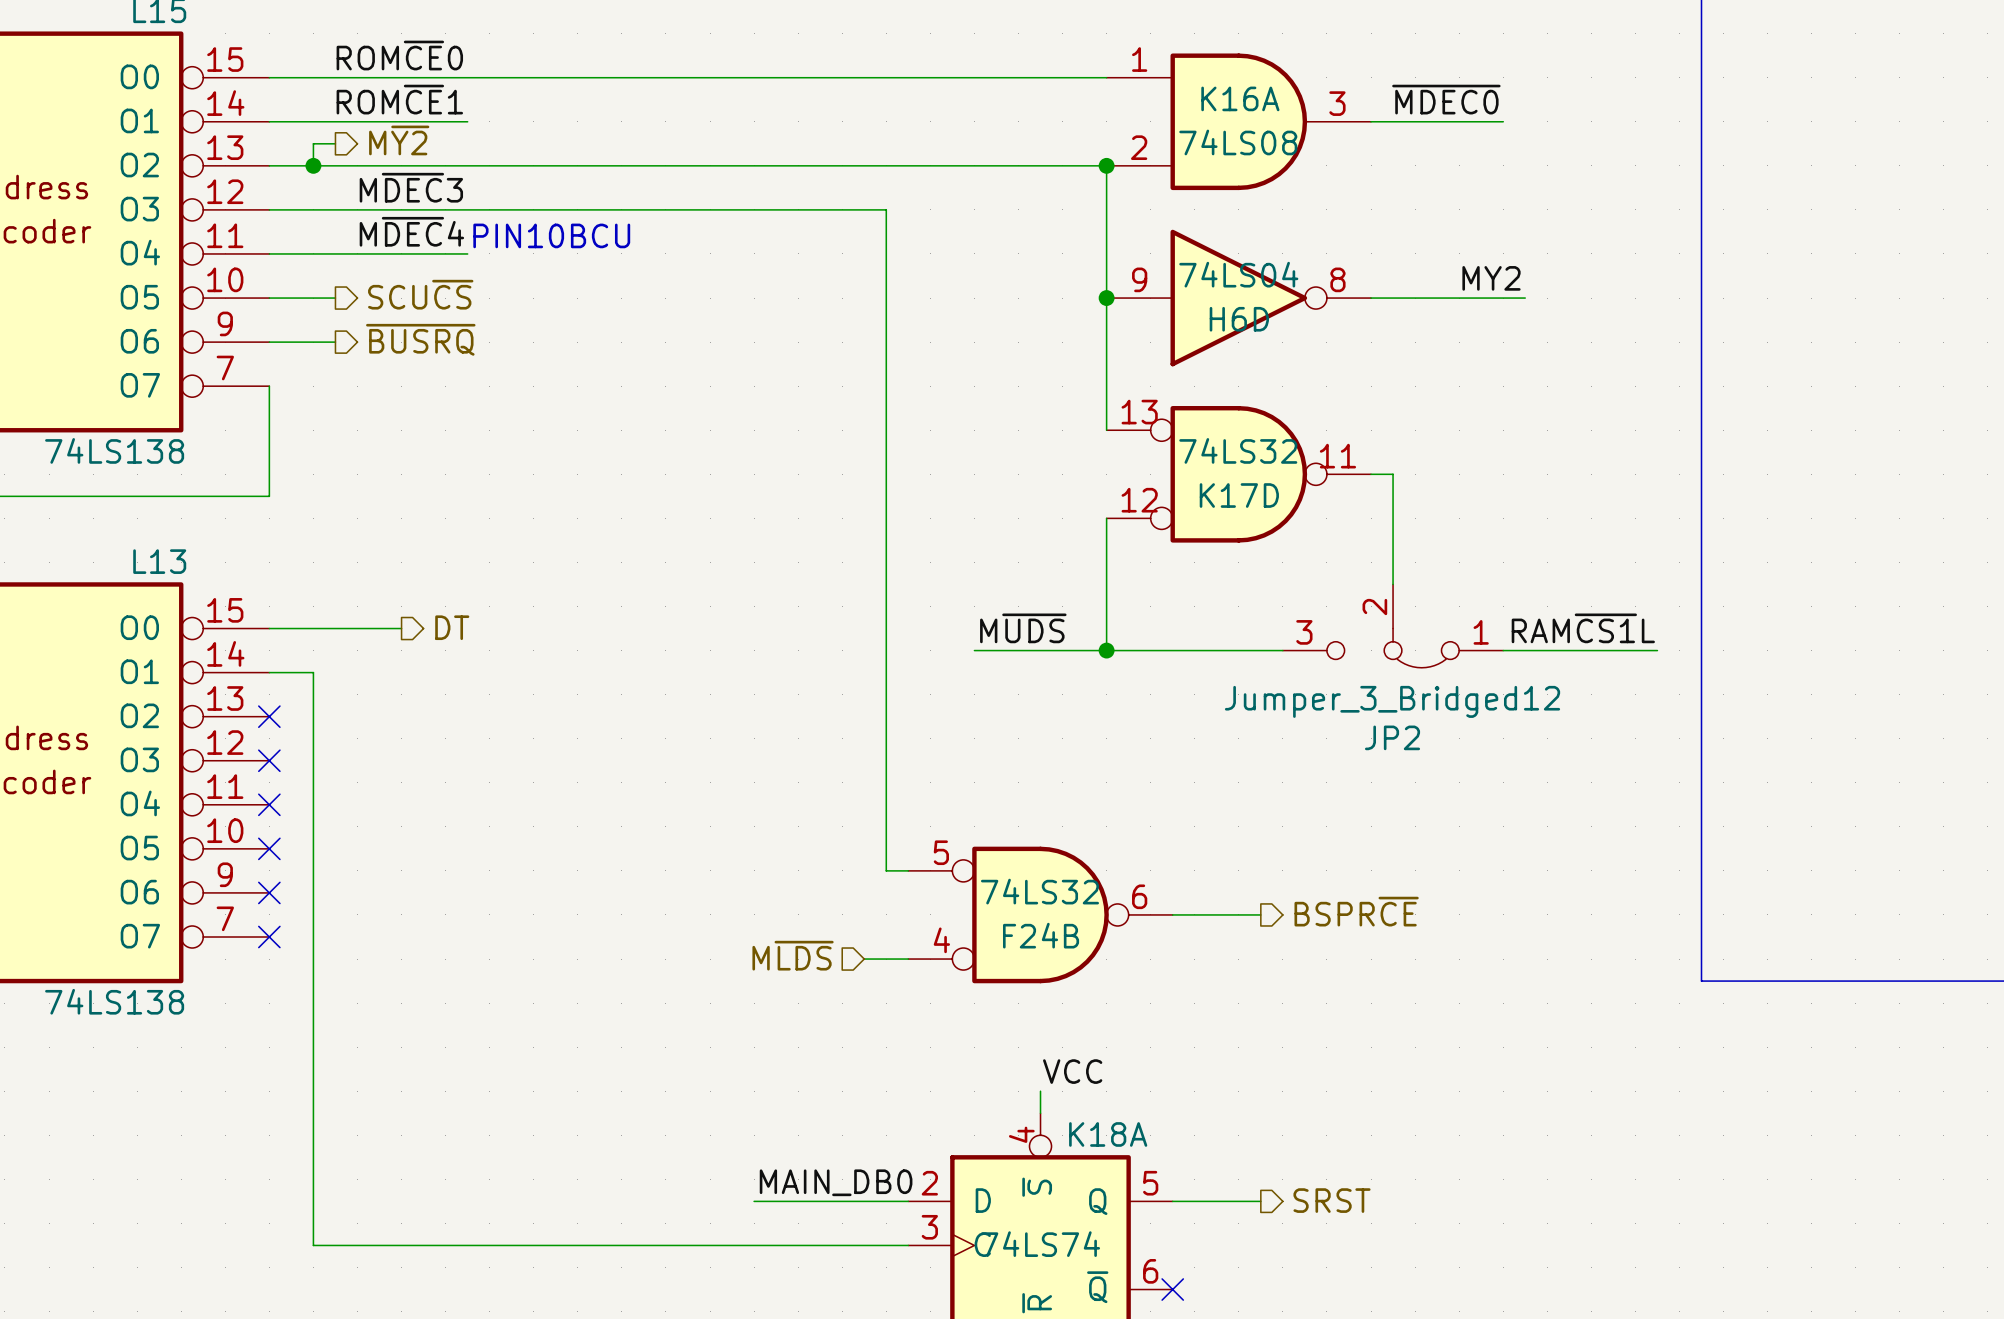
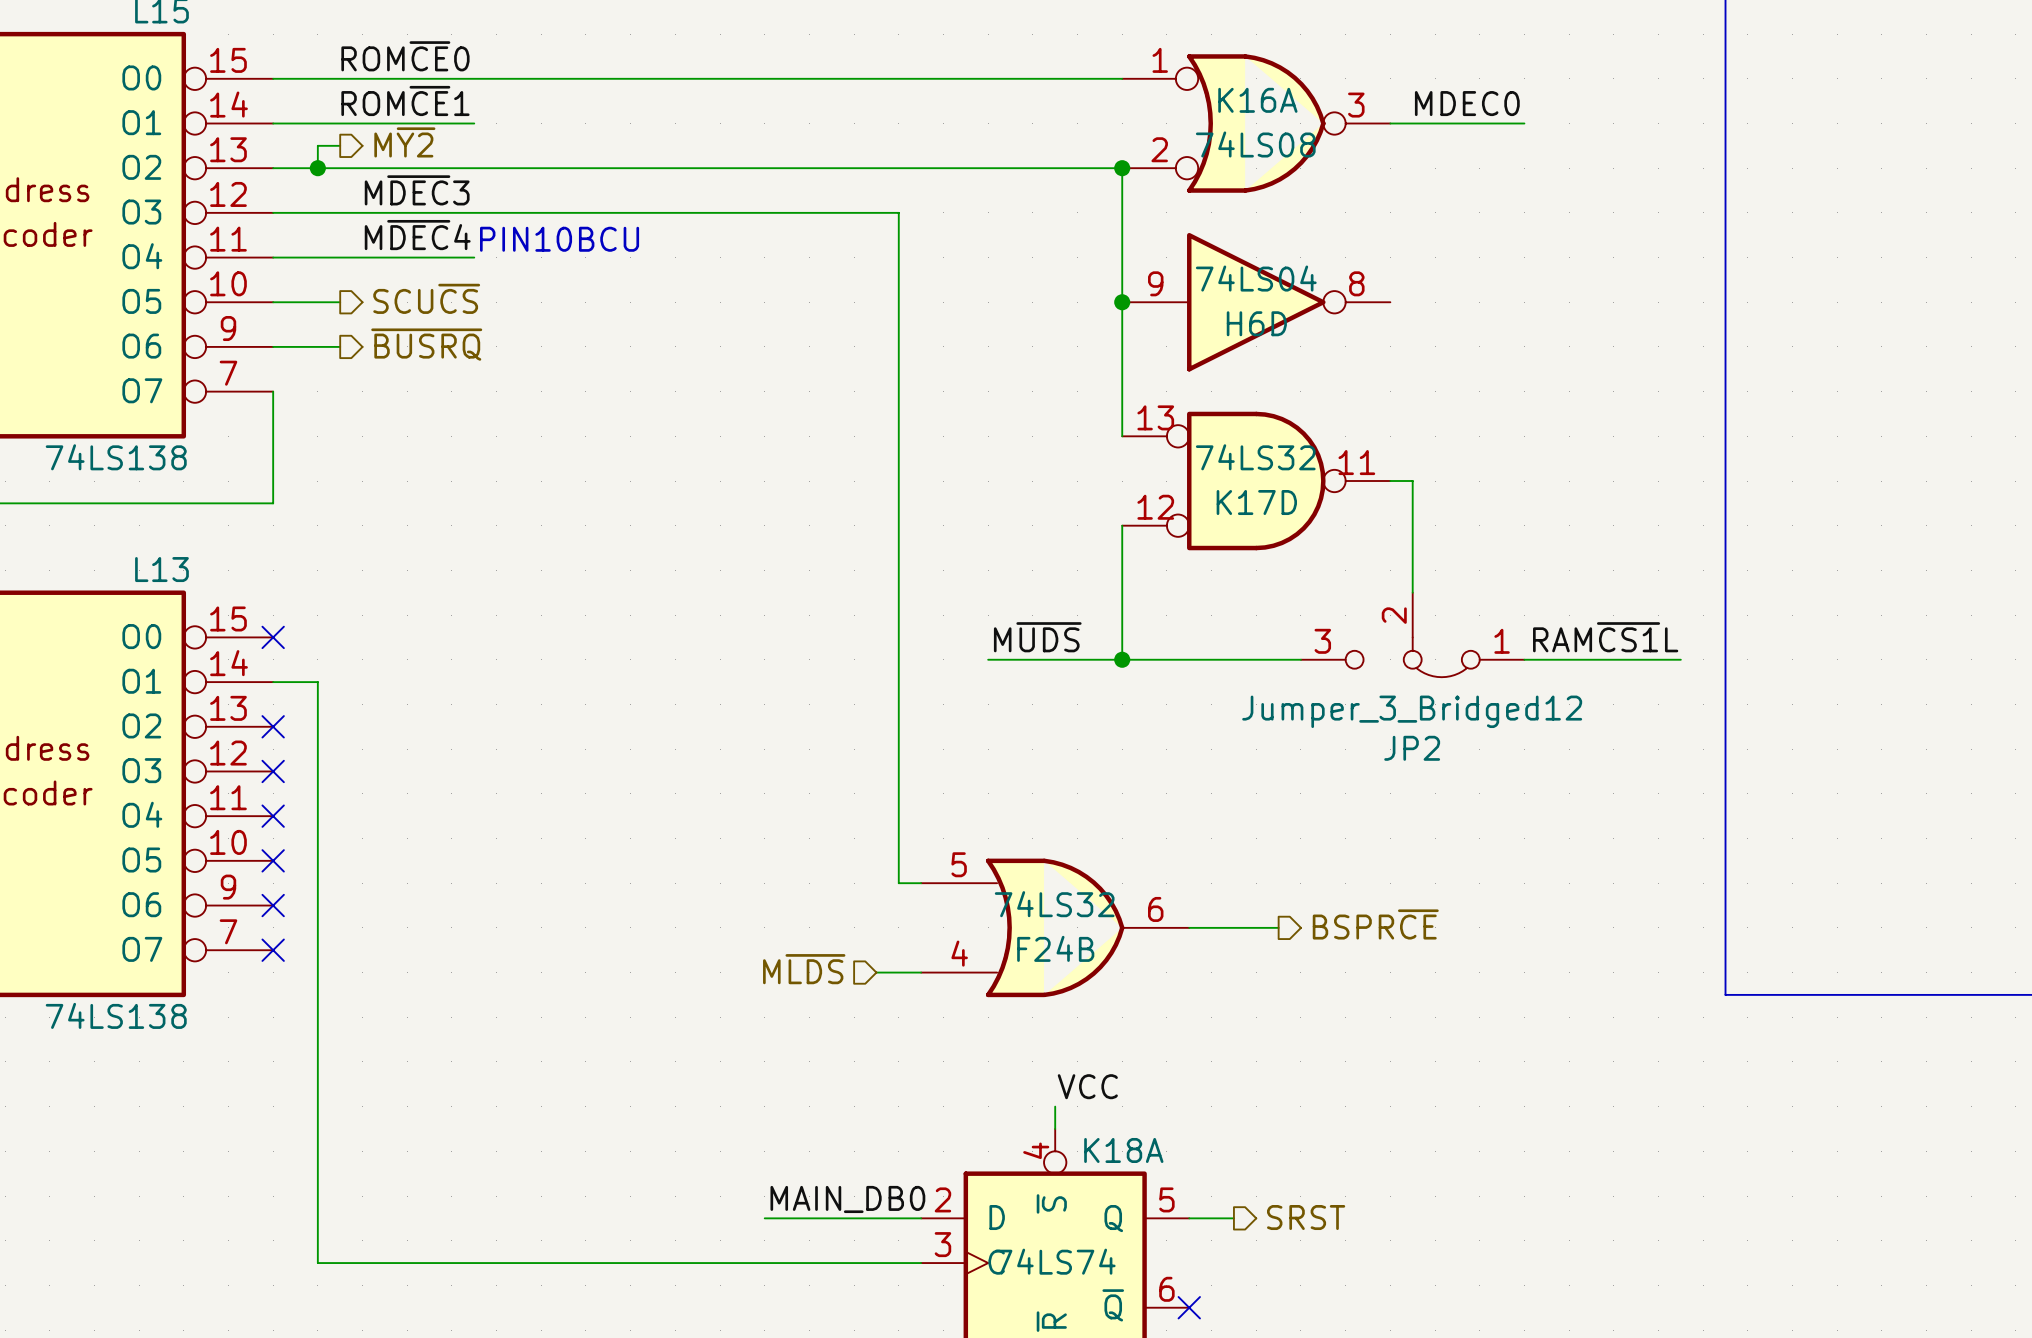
K16A symbol: [1106, 53, 1372, 191] -> [1122, 54, 1391, 193]
label: ~{MDEC0} (1446, 99) -> MDEC0 (1467, 103)
label: MY2 (1491, 278) -> none
wire: (1371, 298) (1525, 298) -> none
hierarchical label: DT (452, 627) -> none
wire: (269, 628) (401, 628) -> none
no-connect mark: none -> (273, 637)
F24B symbol: [908, 846, 1173, 984] -> [921, 858, 1190, 998]
hierarchical label position: SRST (1332, 1200) -> SRST (1306, 1217)
wire: (1216, 1201) (1260, 1201) -> none

